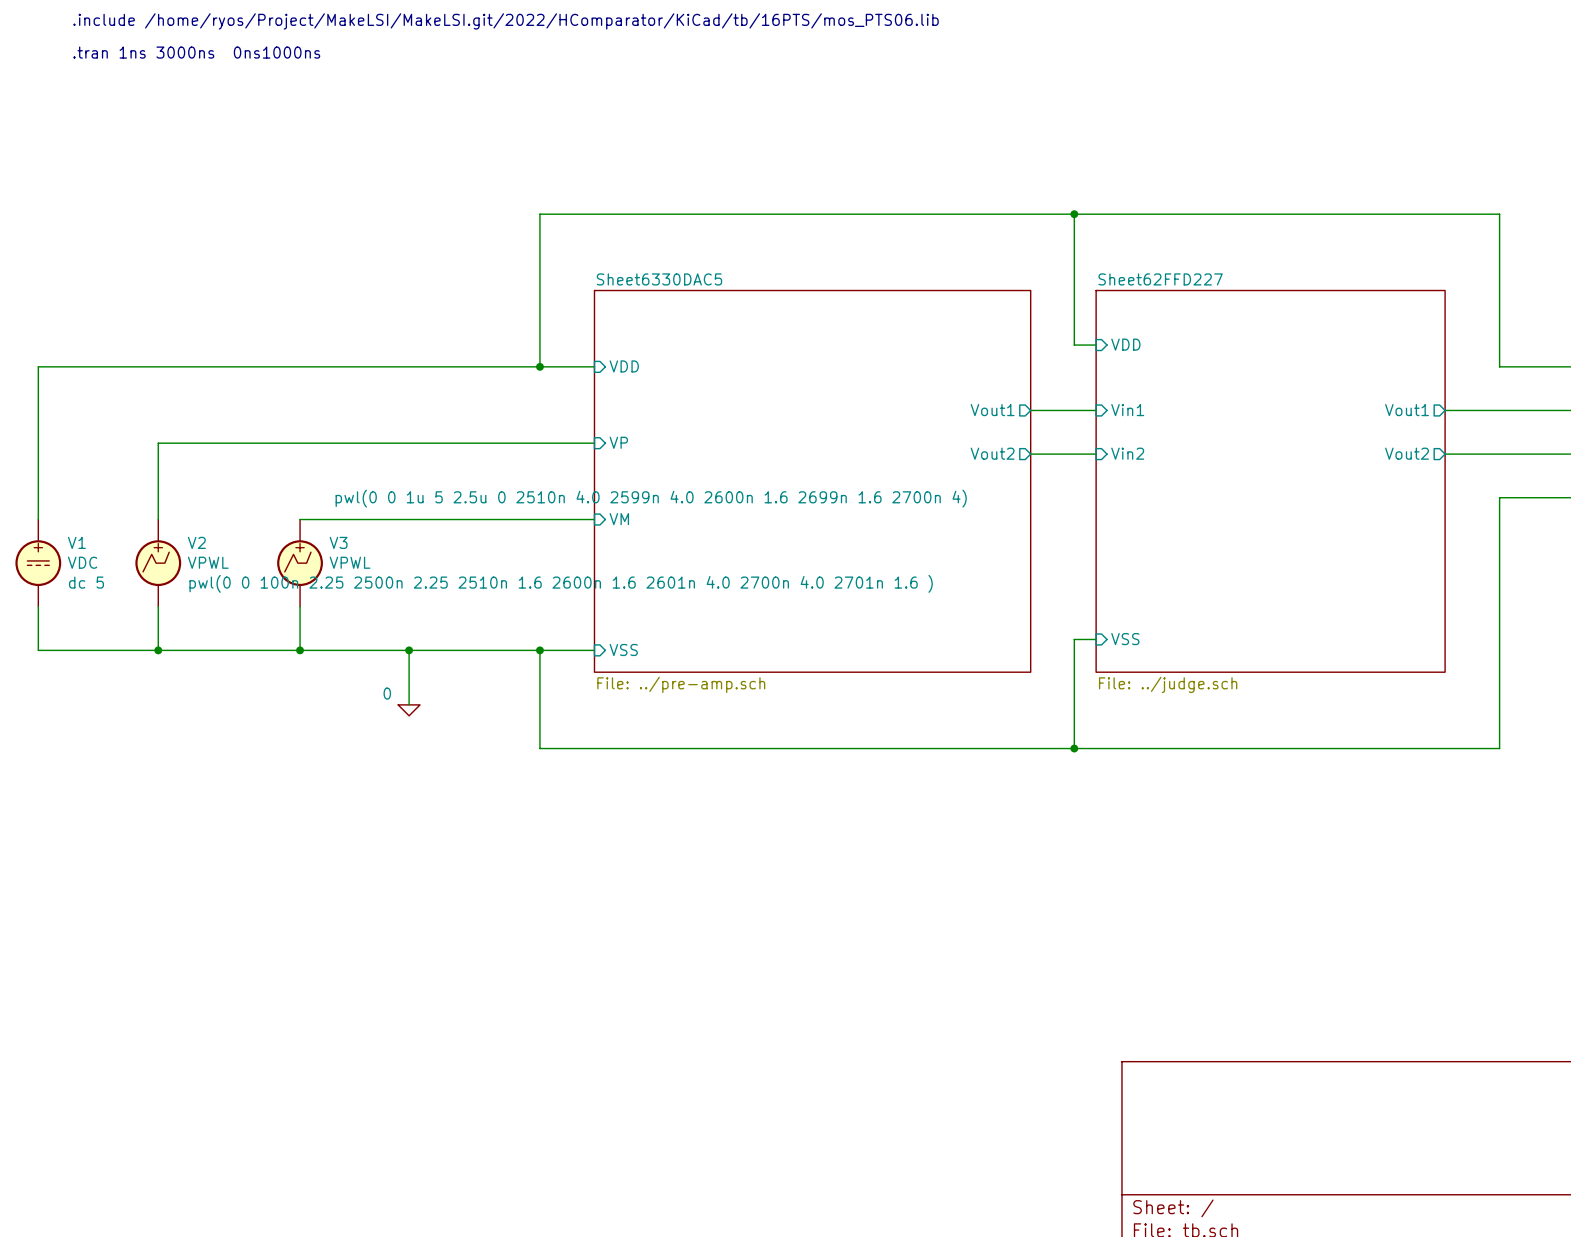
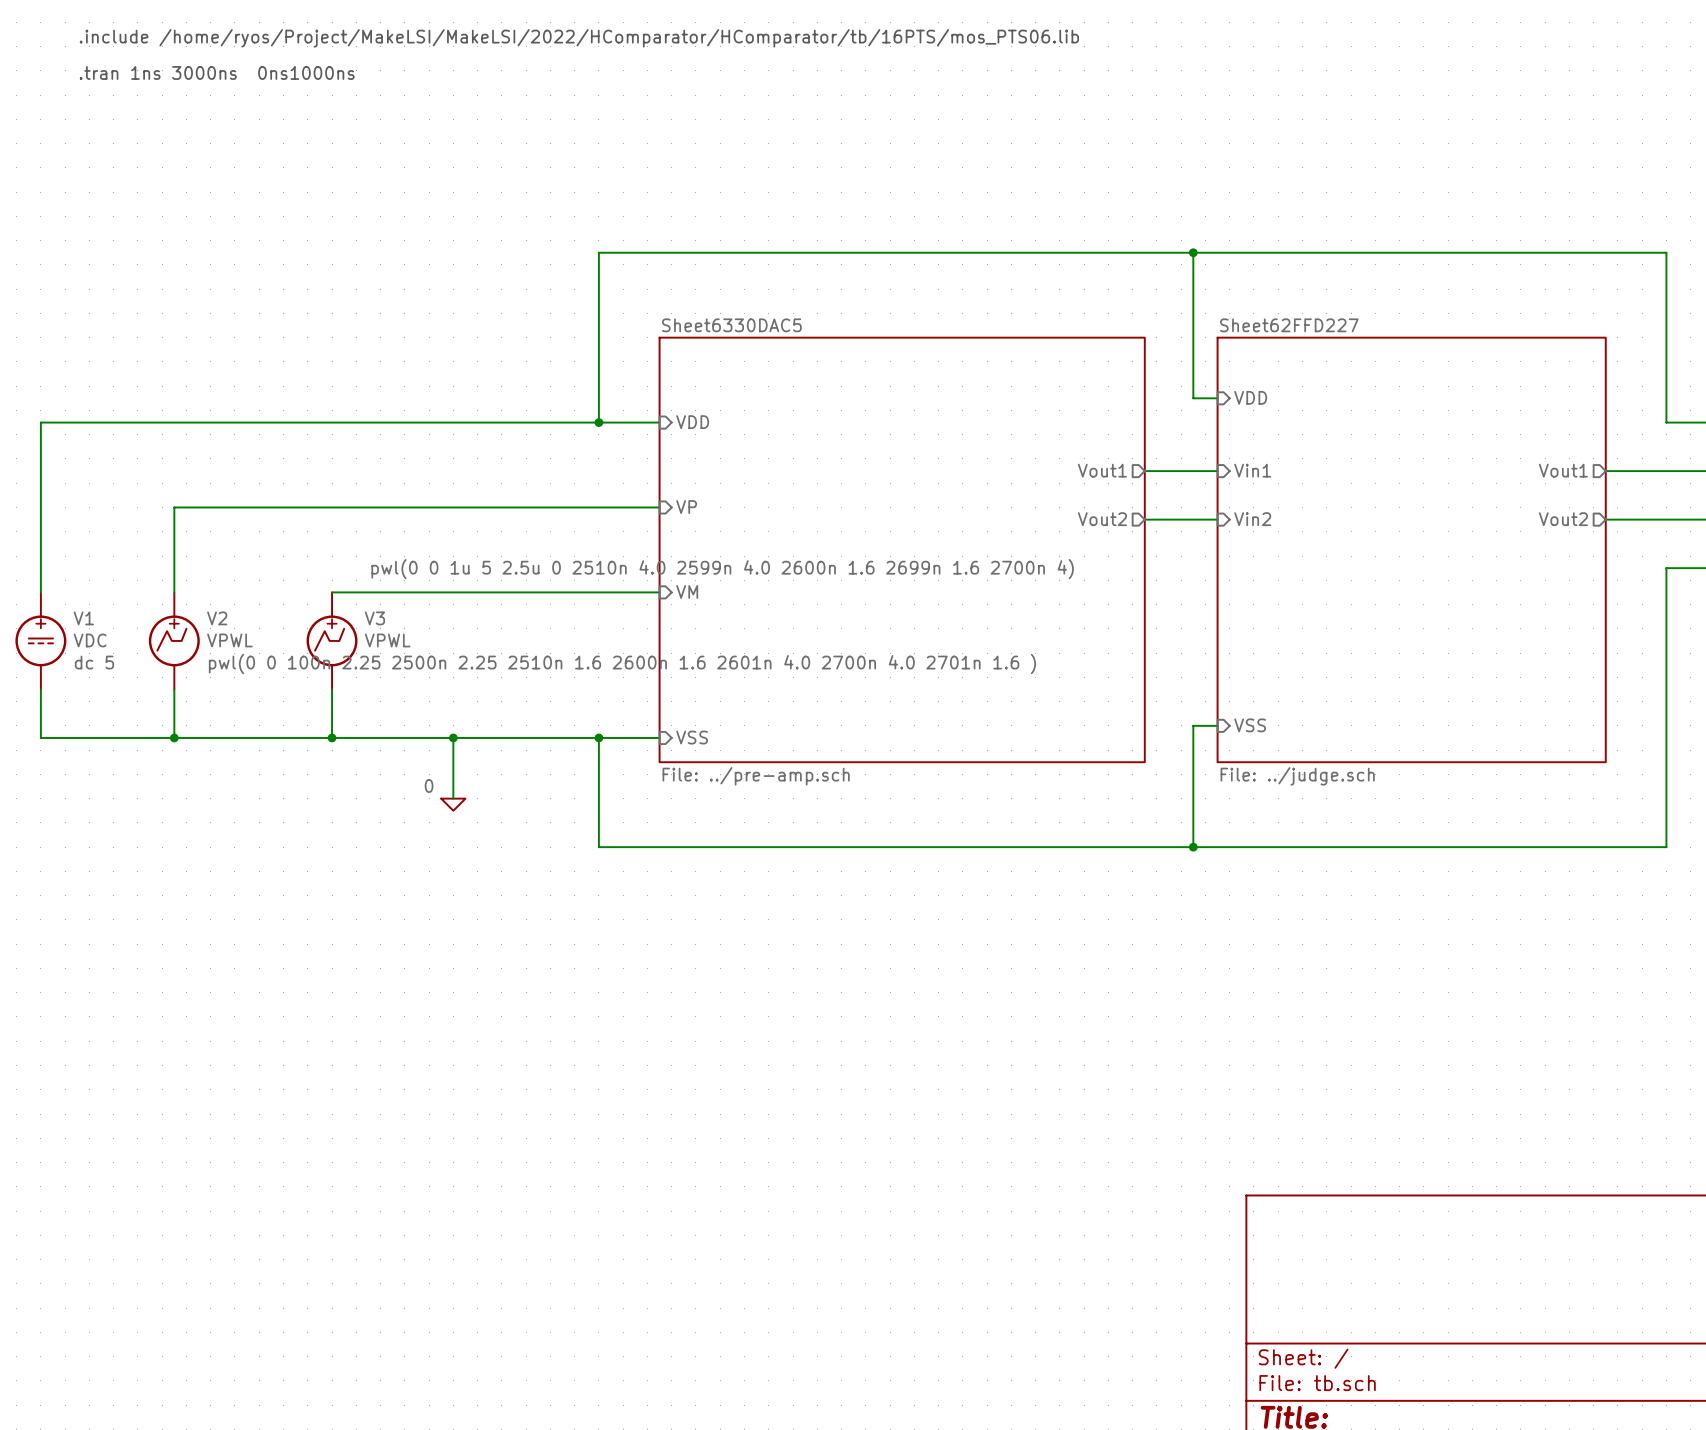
text: .include /home/ryos/Project/MakeLSI/MakeLSI.git/2022/HComparator/KiCad/tb/16PTS/mos_PTS06.lib (506, 21) -> .include /home/ryos/Project/MakeLSI/MakeLSI/2022/HComparator/HComparator/tb/16PTS/mos_PTS06.lib (579, 38)

